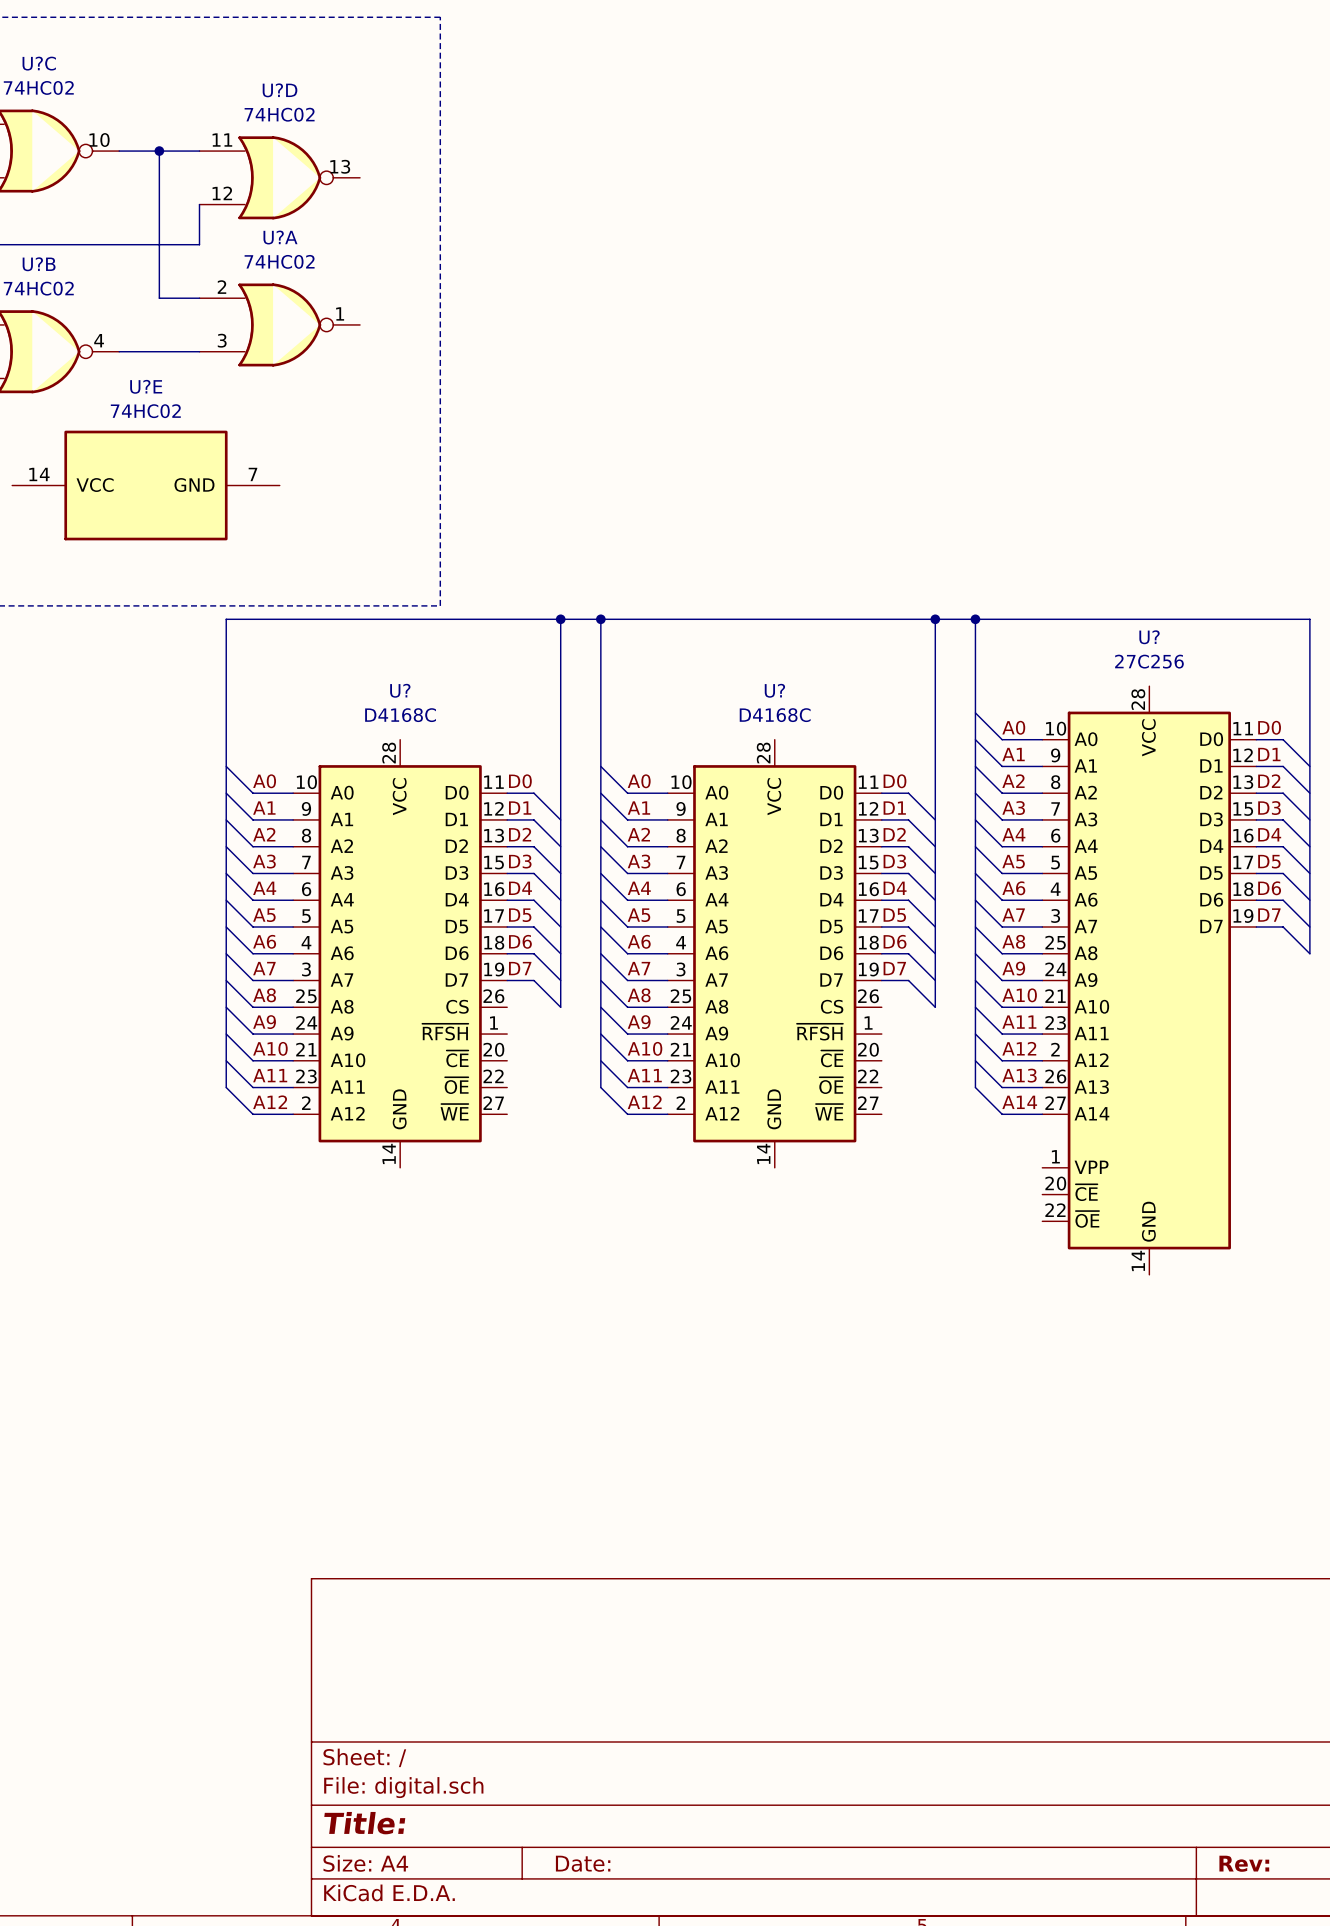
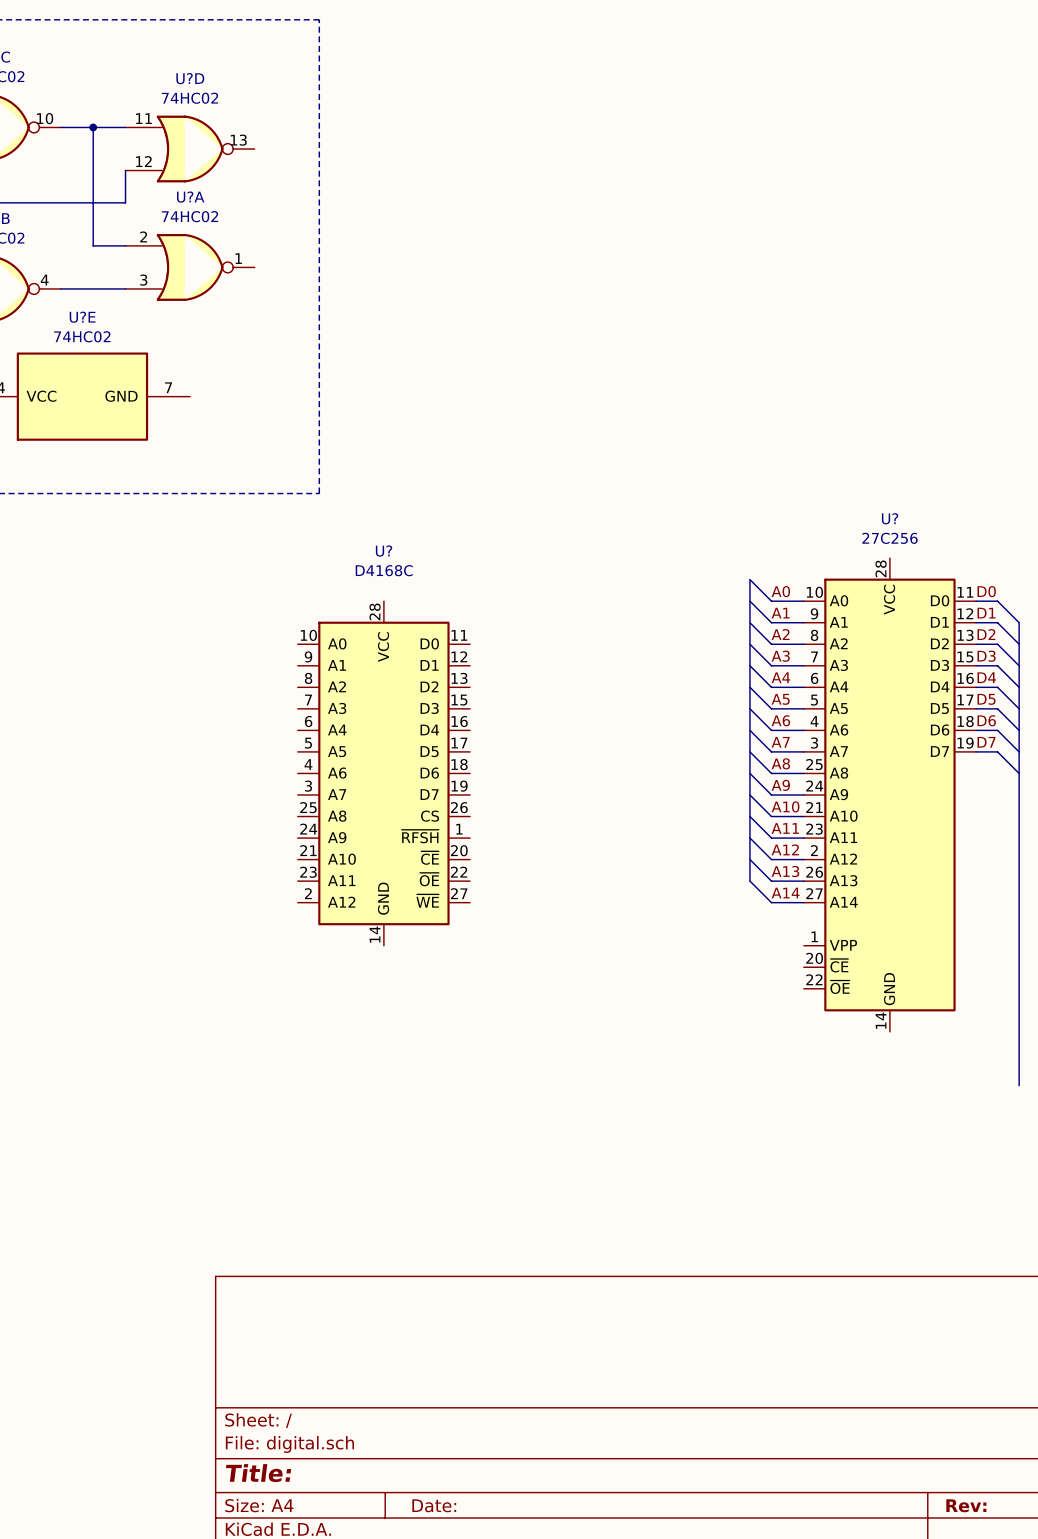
bus: (560, 619) (560, 1007) -> none
junction: (560, 619) -> none
bus: (600, 619) (600, 1087) -> none
junction: (600, 619) -> none
bus: (935, 619) (935, 1007) -> none
junction: (935, 619) -> none
bus: (975, 619) (975, 712) -> none
junction: (975, 619) -> none
U? name position: U? (400, 690) -> U? (384, 551)
U? value position: D4168C (400, 715) -> D4168C (384, 570)
wire: (226, 766) (253, 793) (293, 793) -> none
wire: (600, 766) (627, 793) (667, 793) -> none
bus: (1309, 766) (1309, 619) (226, 619) (226, 1087) -> none
label: A0 (264, 781) -> none
label: D0 (520, 781) -> none
label: A0 (639, 781) -> none
label: D0 (894, 781) -> none
wire: (226, 793) (253, 819) (293, 819) -> none
wire: (600, 793) (627, 819) (667, 819) -> none
wire: (881, 793) (908, 793) (935, 819) -> none
label: A1 (264, 808) -> none
label: D1 (520, 808) -> none
label: A1 (638, 808) -> none
label: D1 (894, 808) -> none
wire: (226, 819) (253, 846) (293, 846) -> none
wire: (600, 819) (627, 846) (667, 846) -> none
wire: (881, 819) (908, 819) (935, 846) -> none
label: A2 (264, 834) -> none
label: D2 (520, 834) -> none
label: A2 (638, 834) -> none
label: D2 (894, 834) -> none
wire: (226, 846) (253, 873) (293, 873) -> none
wire: (600, 846) (627, 873) (667, 873) -> none
wire: (881, 846) (908, 846) (935, 873) -> none
label: A3 (264, 861) -> none
label: D3 (520, 861) -> none
label: A3 (639, 861) -> none
label: D3 (894, 861) -> none
wire: (226, 873) (253, 900) (293, 900) -> none
wire: (600, 873) (627, 900) (667, 900) -> none
wire: (881, 873) (908, 873) (935, 900) -> none
label: A4 (264, 888) -> none
label: D4 (520, 888) -> none
label: A4 (639, 888) -> none
label: D4 (895, 888) -> none
wire: (226, 900) (253, 927) (293, 927) -> none
wire: (600, 900) (627, 927) (667, 927) -> none
wire: (881, 900) (908, 900) (935, 927) -> none
label: A5 (264, 915) -> none
label: D5 (520, 915) -> none
label: A5 (638, 915) -> none
label: D5 (894, 915) -> none
wire: (226, 927) (253, 953) (293, 953) -> none
wire: (600, 927) (627, 953) (667, 953) -> none
wire: (881, 927) (908, 927) (935, 953) -> none
label: A6 (264, 941) -> none
label: D6 (520, 941) -> none
label: A6 (639, 941) -> none
label: D6 (895, 941) -> none
wire: (226, 953) (253, 980) (293, 980) -> none
U? position: (400, 953) -> (383, 773)
wire: (600, 953) (627, 980) (667, 980) -> none
U?: D4168C (774, 953) -> none
wire: (881, 953) (908, 953) (935, 980) -> none
bus: none -> (1019, 773) (1019, 1085)
label: A7 (264, 968) -> none
label: D7 (520, 968) -> none
label: A7 (639, 968) -> none
label: D7 (894, 968) -> none
wire: (226, 980) (253, 1007) (293, 1007) -> none
wire: (600, 980) (627, 1007) (667, 1007) -> none
wire: (881, 980) (908, 980) (935, 1007) -> none
label: A8 (264, 995) -> none
label: A8 (639, 995) -> none
wire: (226, 1007) (253, 1034) (293, 1034) -> none
wire: (600, 1007) (627, 1034) (667, 1034) -> none
label: A9 (264, 1022) -> none
label: A9 (639, 1022) -> none
wire: (226, 1034) (253, 1060) (293, 1060) -> none
wire: (600, 1034) (627, 1060) (667, 1060) -> none
label: A10 (270, 1048) -> none
label: A10 (645, 1048) -> none
wire: (226, 1060) (253, 1087) (293, 1087) -> none
wire: (600, 1060) (627, 1087) (667, 1087) -> none
label: A11 (270, 1075) -> none
label: A11 (644, 1075) -> none
wire: (226, 1087) (253, 1114) (293, 1114) -> none
wire: (600, 1087) (627, 1114) (667, 1114) -> none
label: A12 (270, 1102) -> none
label: A12 (644, 1102) -> none

